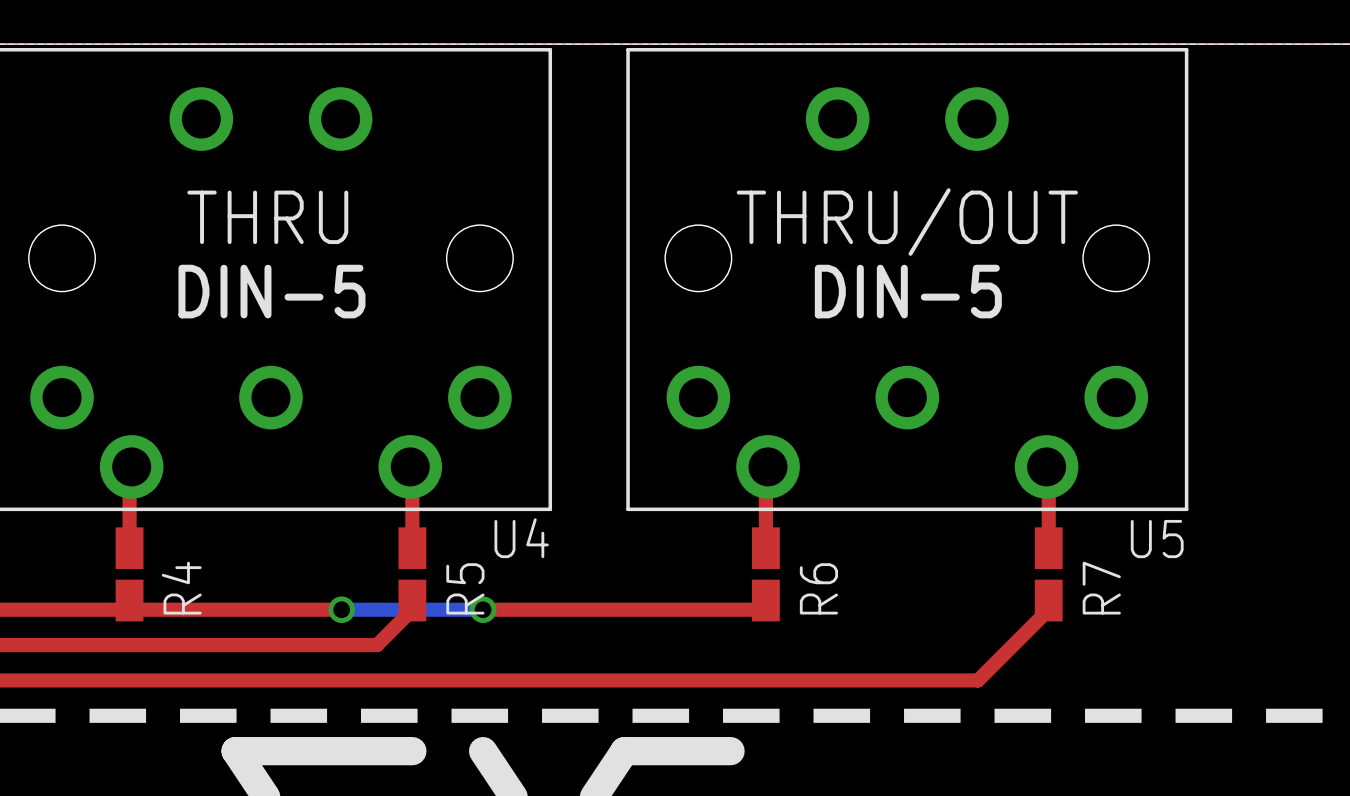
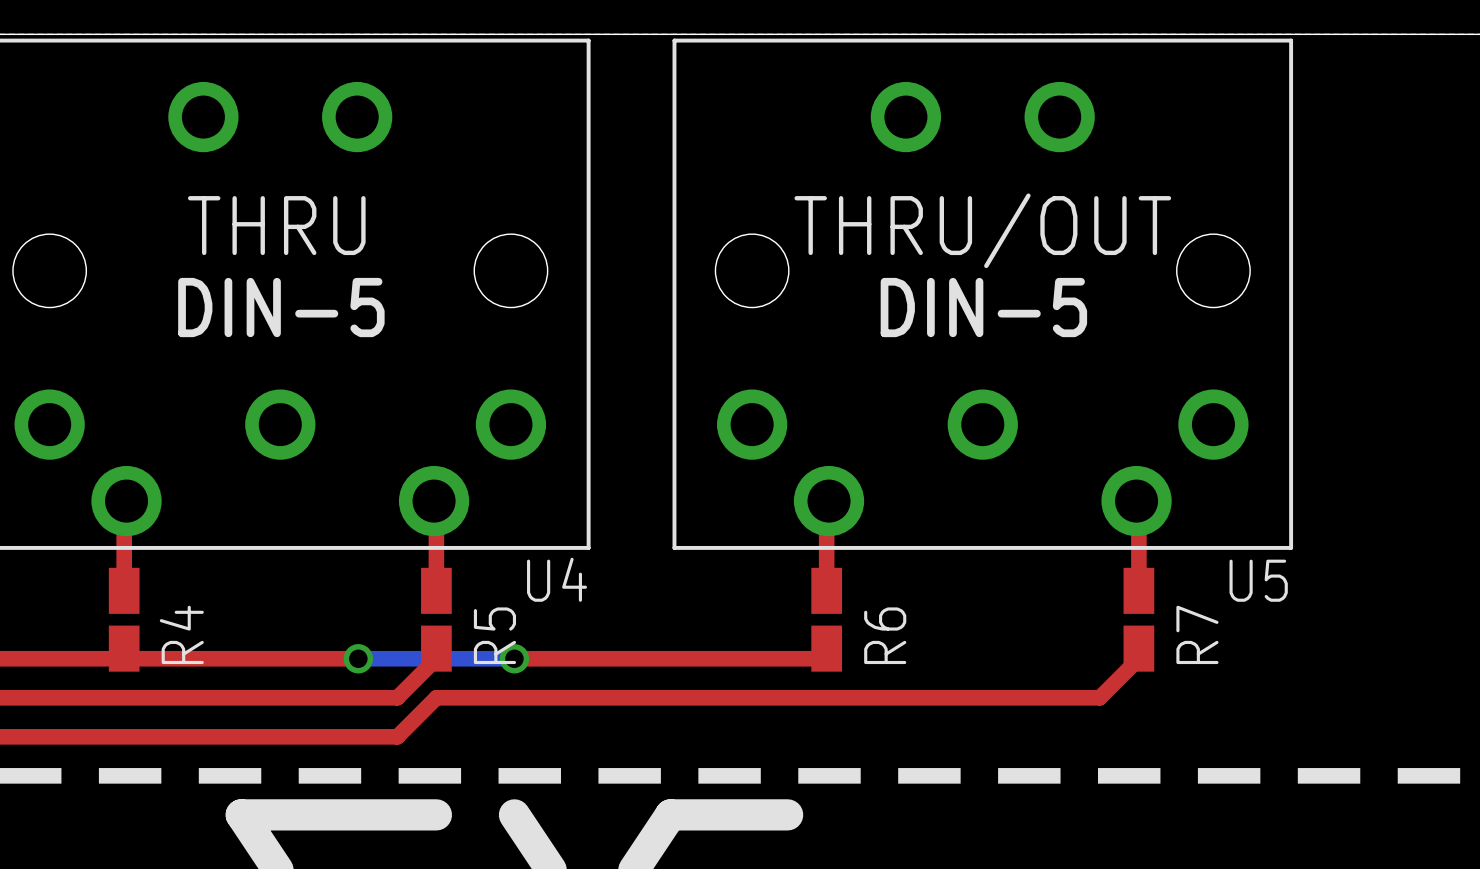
top track: (1013, 645) (978, 680) (377, 680) -> (1099, 697) (436, 697) (397, 736)

